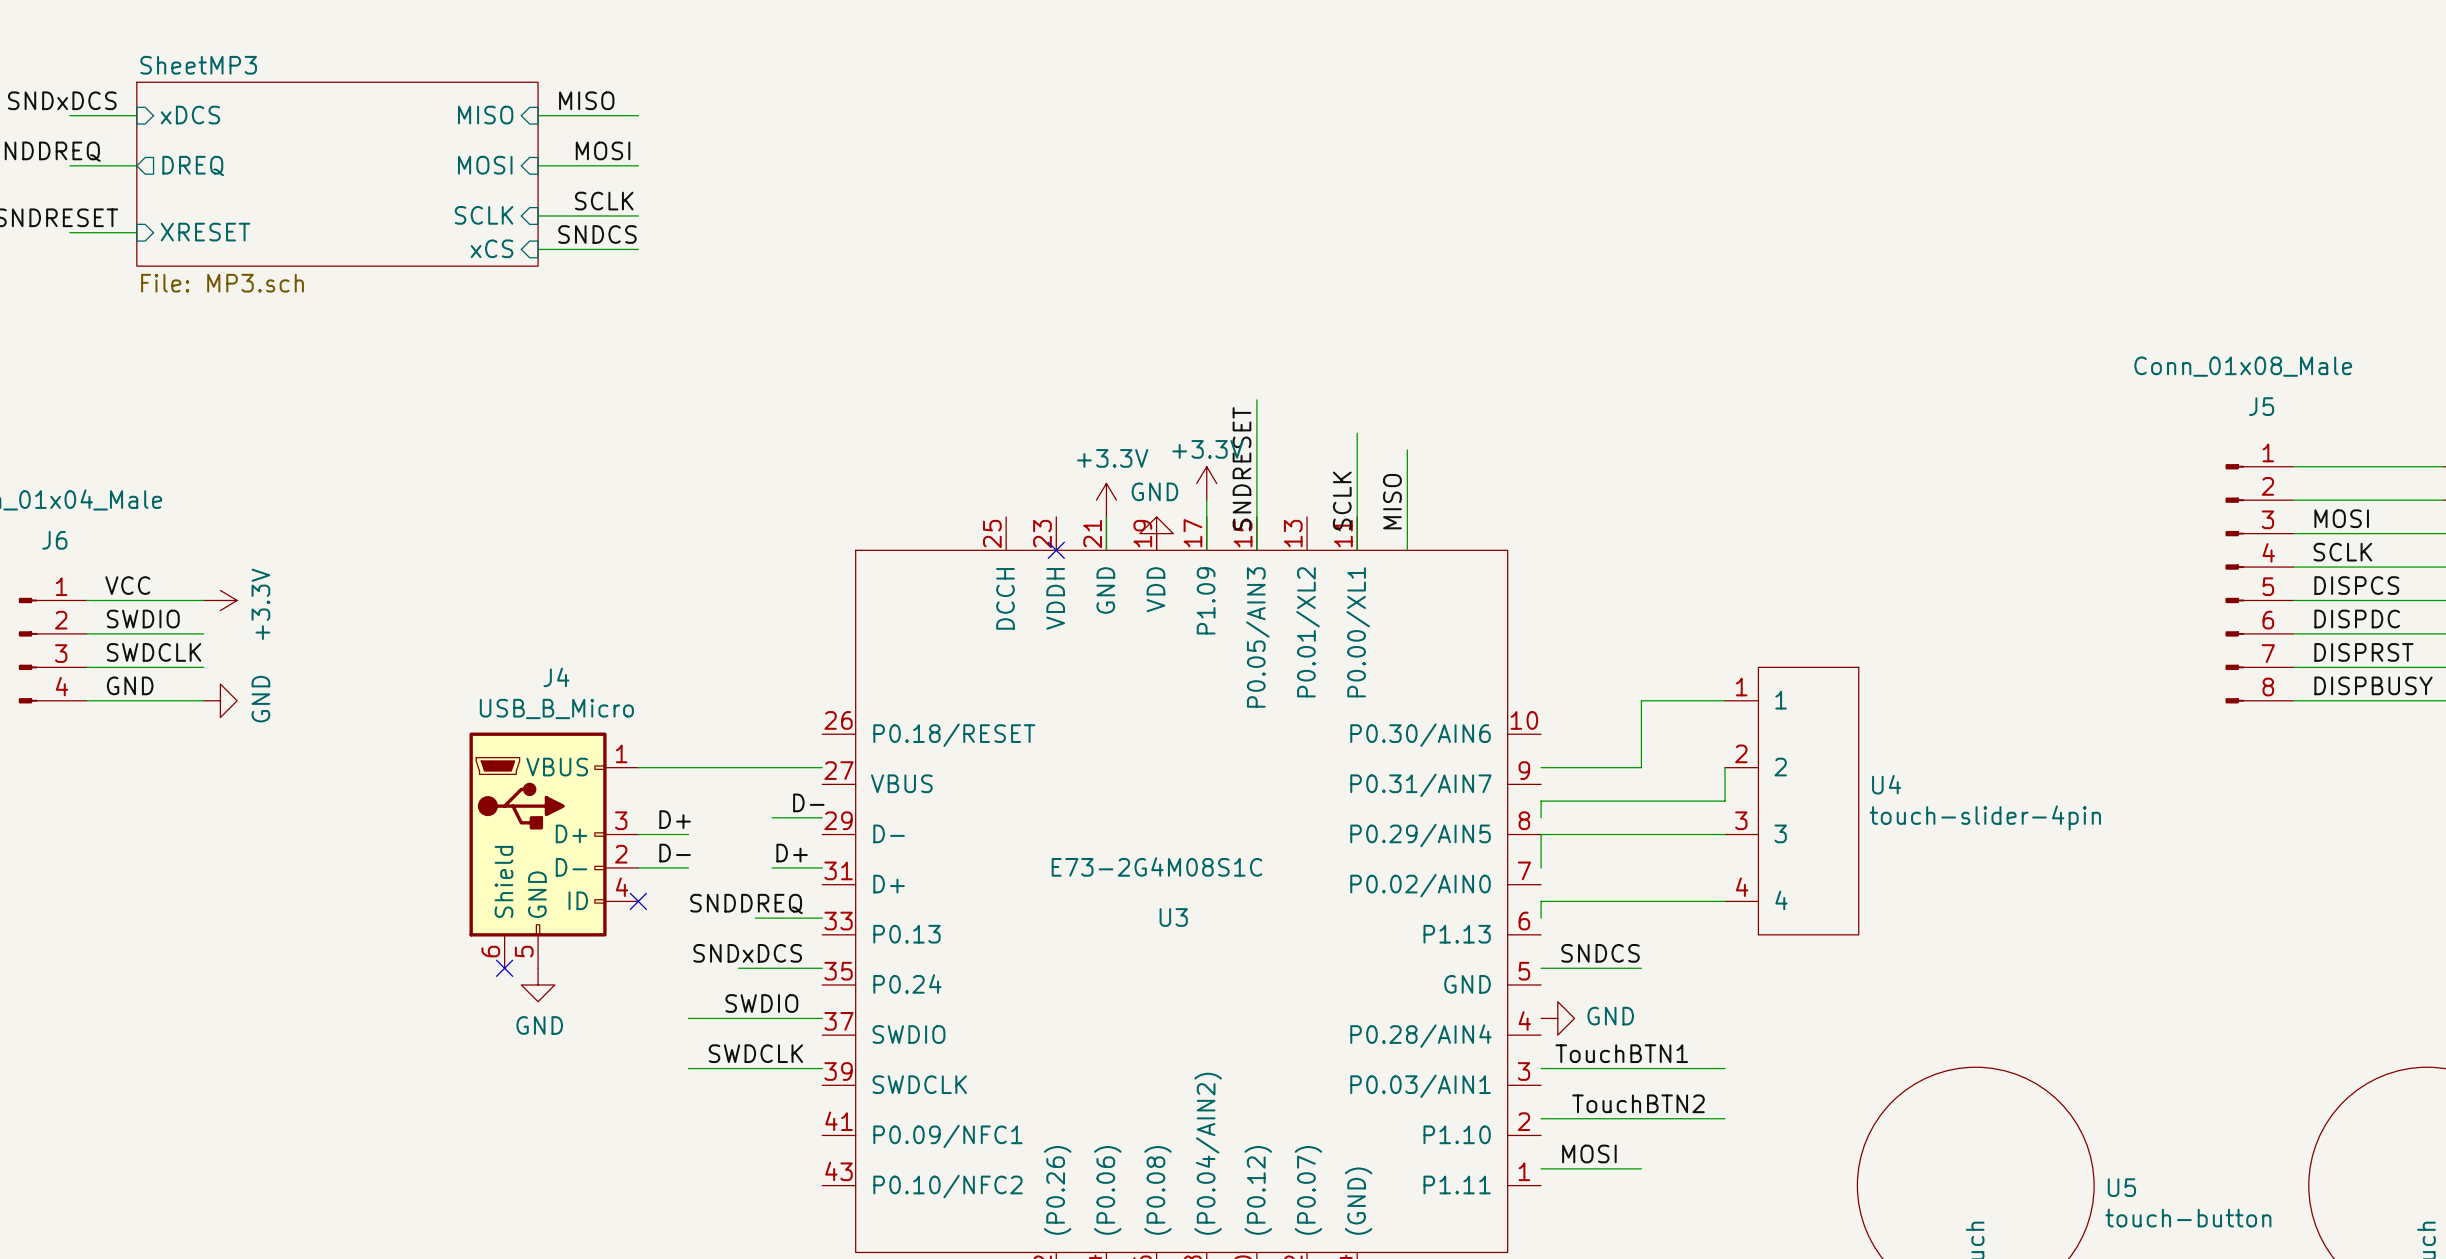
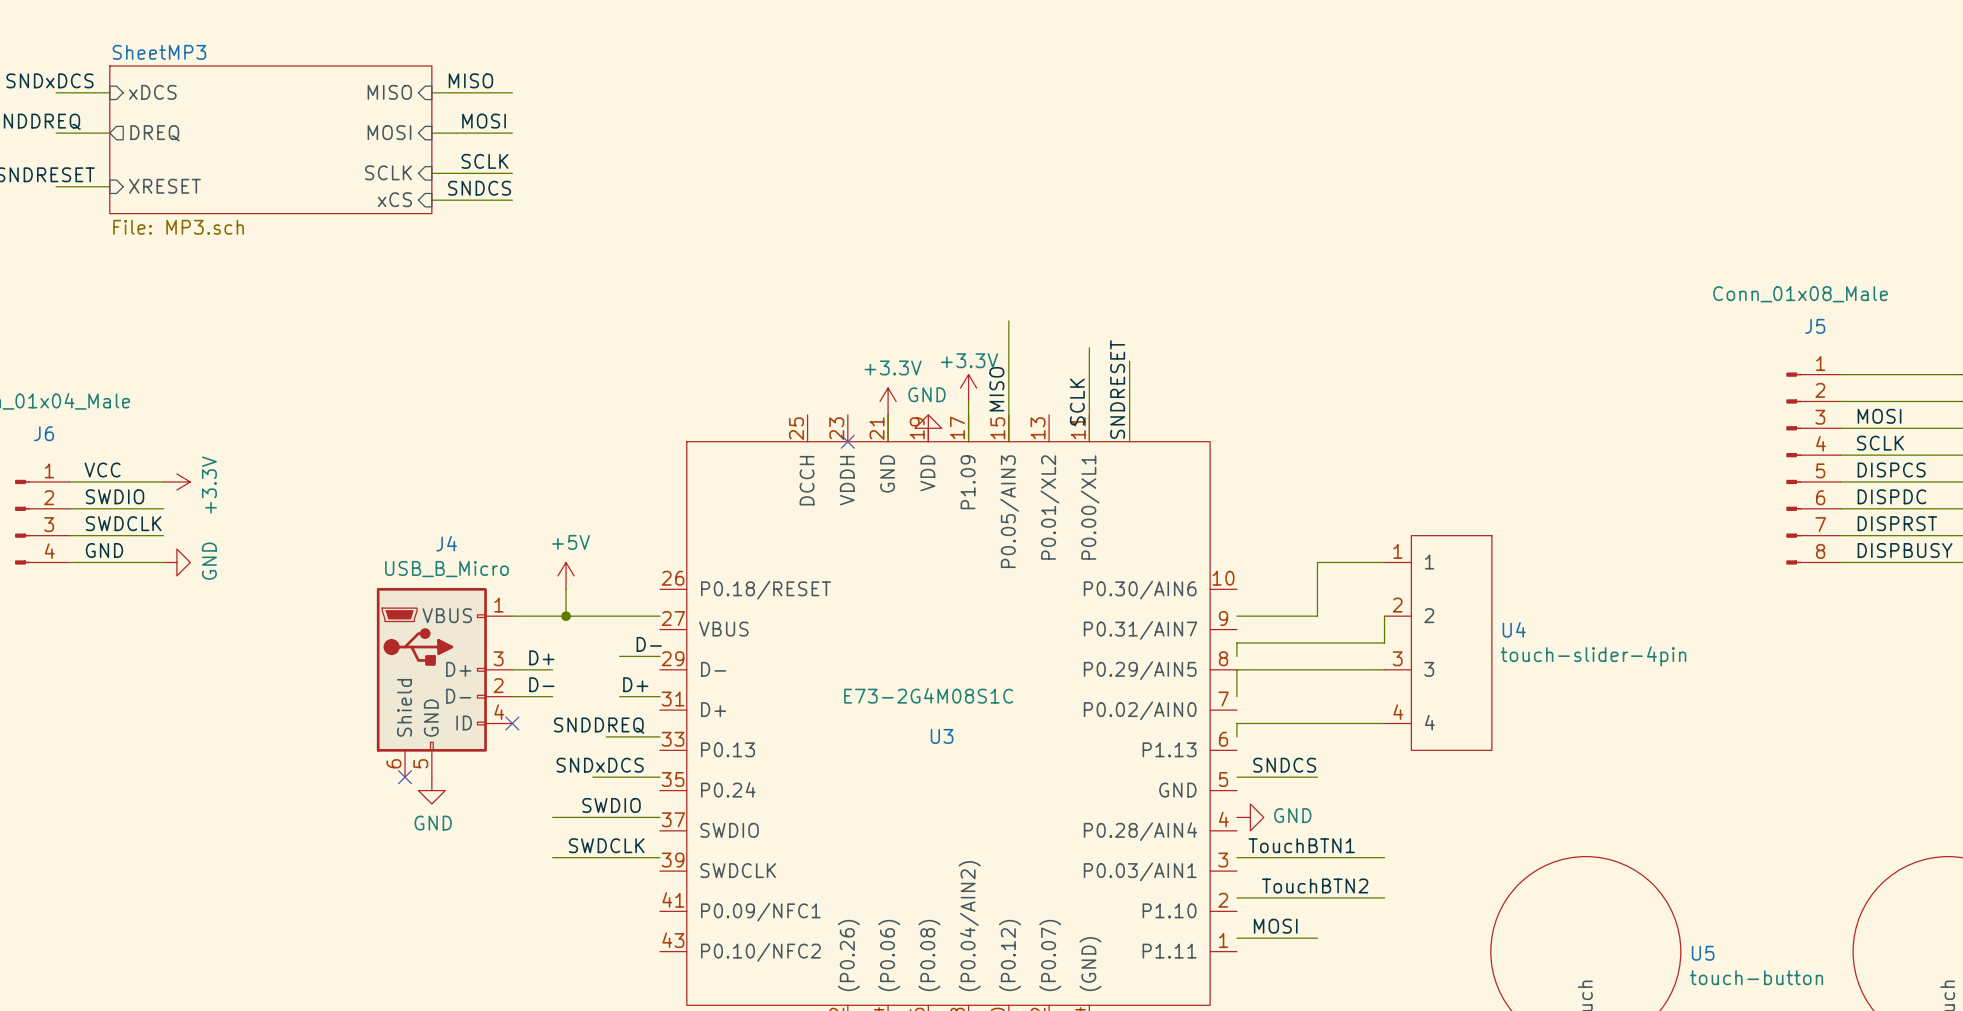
label position: SNDRESET (1241, 468) -> SNDRESET (1117, 389)
label position: MISO (1392, 501) -> MISO (996, 389)
power symbol: none -> +5V (566, 575)
wire: none -> (566, 589) (566, 616)
junction: none -> (566, 616)

